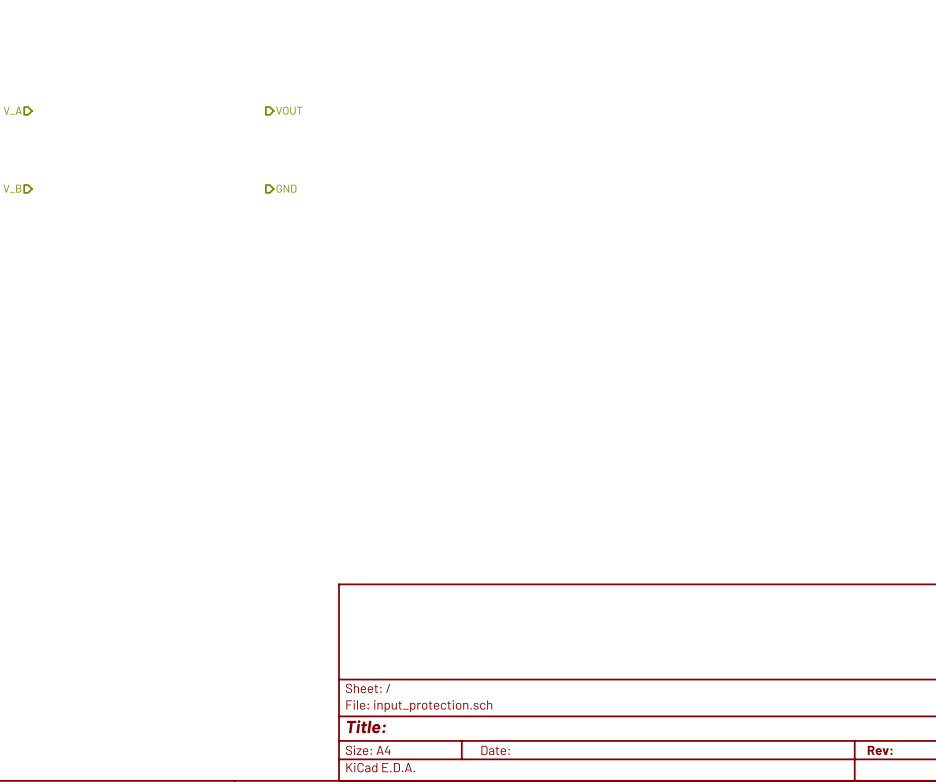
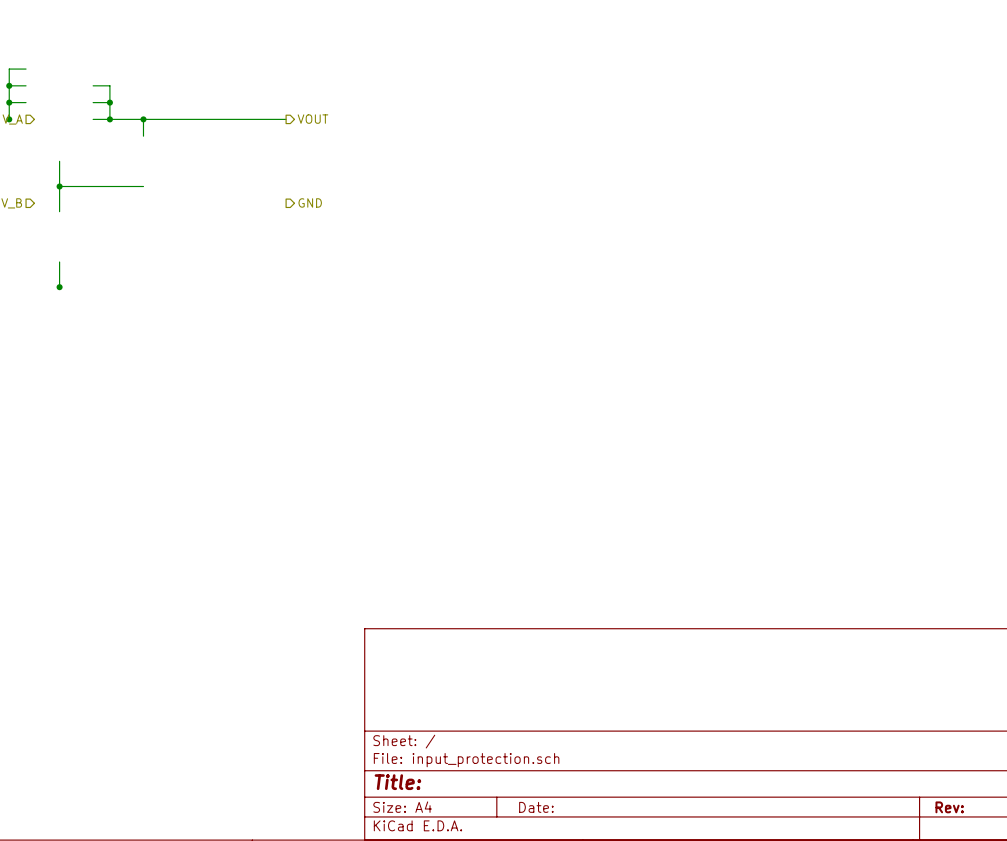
wire: none -> (26, 69) (9, 69) (9, 119)
wire: none -> (9, 85) (26, 85)
junction: none -> (9, 85)
wire: none -> (93, 85) (109, 85) (109, 119)
wire: none -> (9, 102) (26, 102)
junction: none -> (9, 102)
wire: none -> (93, 102) (109, 102)
junction: none -> (109, 102)
junction: none -> (9, 119)
wire: none -> (93, 119) (286, 119)
junction: none -> (109, 119)
wire: none -> (143, 119) (143, 136)
junction: none -> (143, 119)
wire: none -> (59, 161) (59, 211)
wire: none -> (59, 186) (143, 186)
junction: none -> (59, 186)
wire: none -> (59, 262) (59, 287)
junction: none -> (59, 287)

